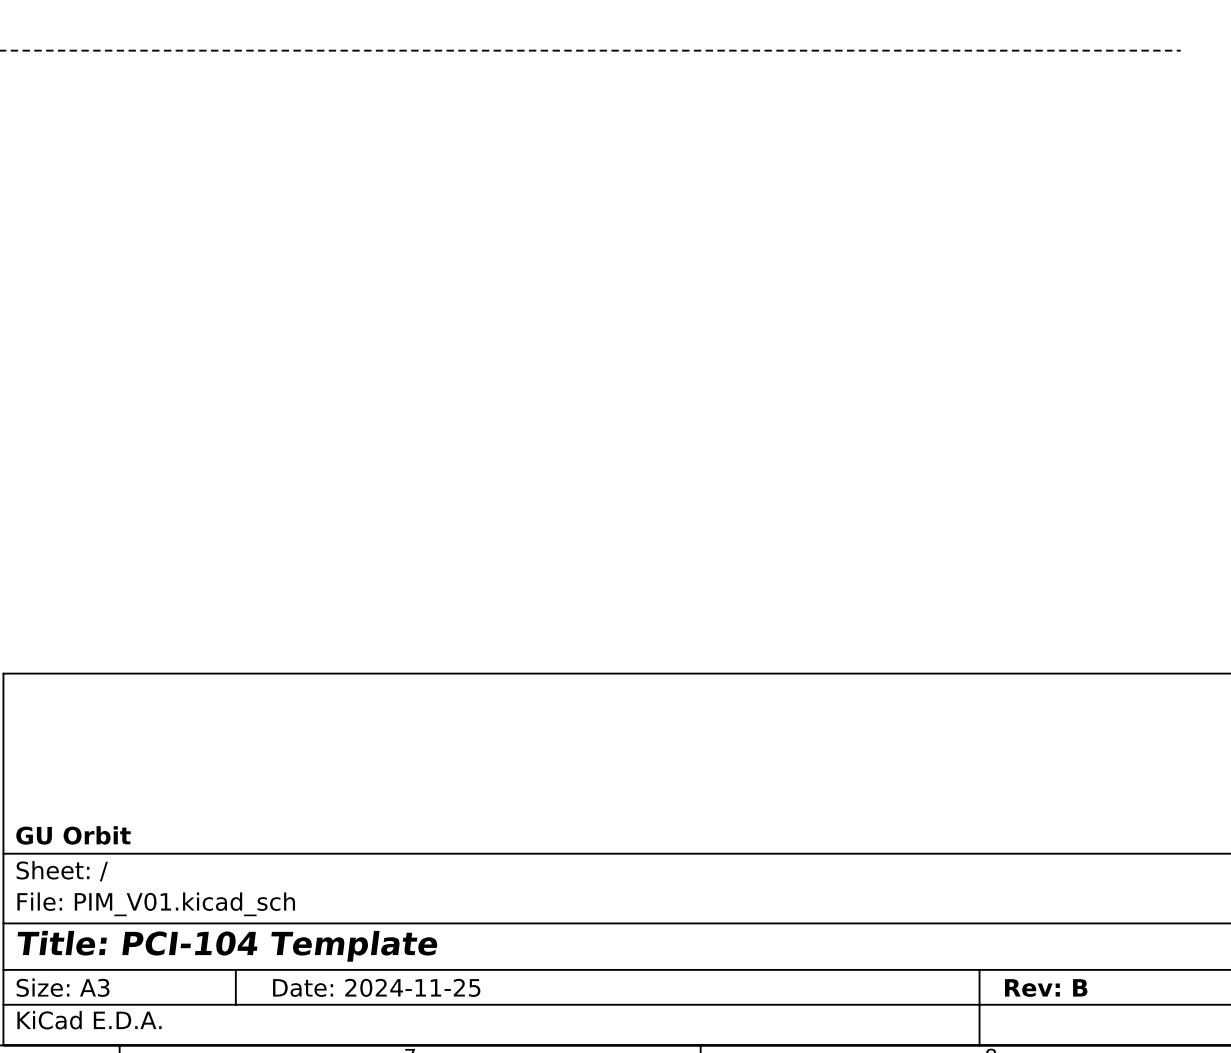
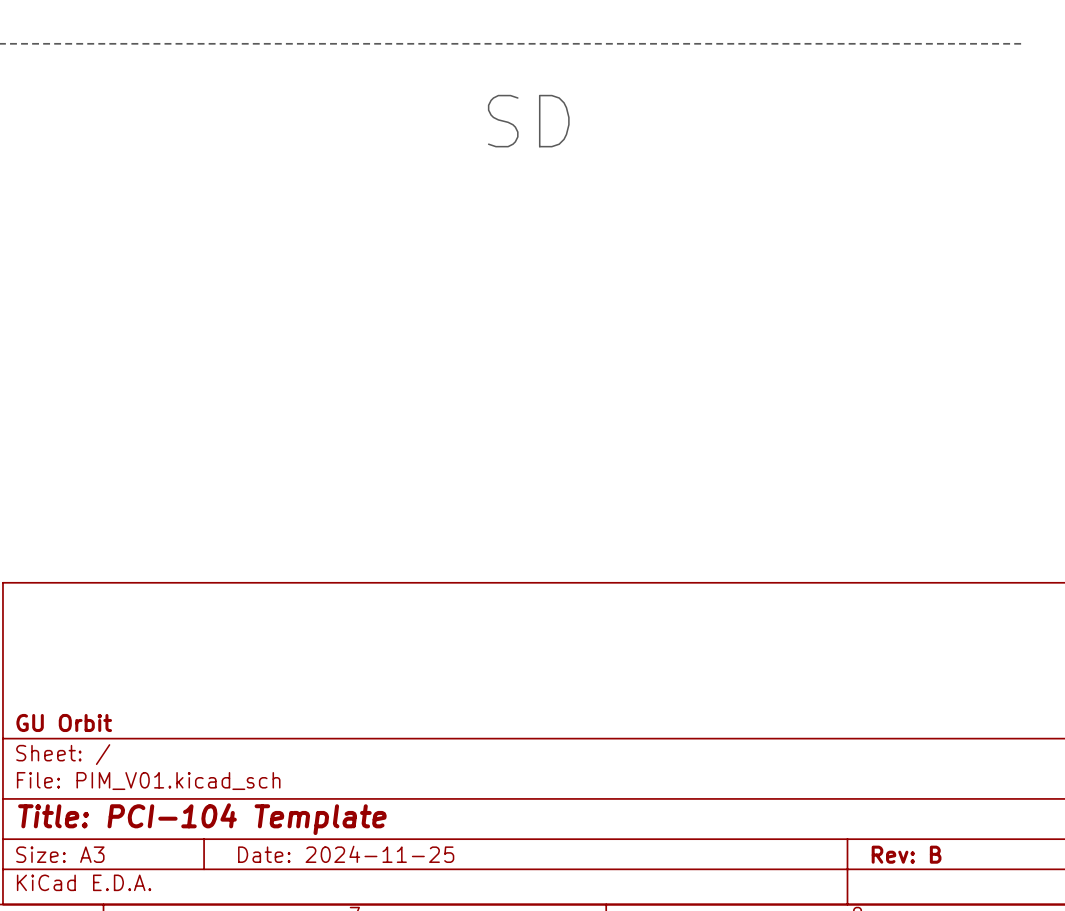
text: none -> SD (528, 121)

